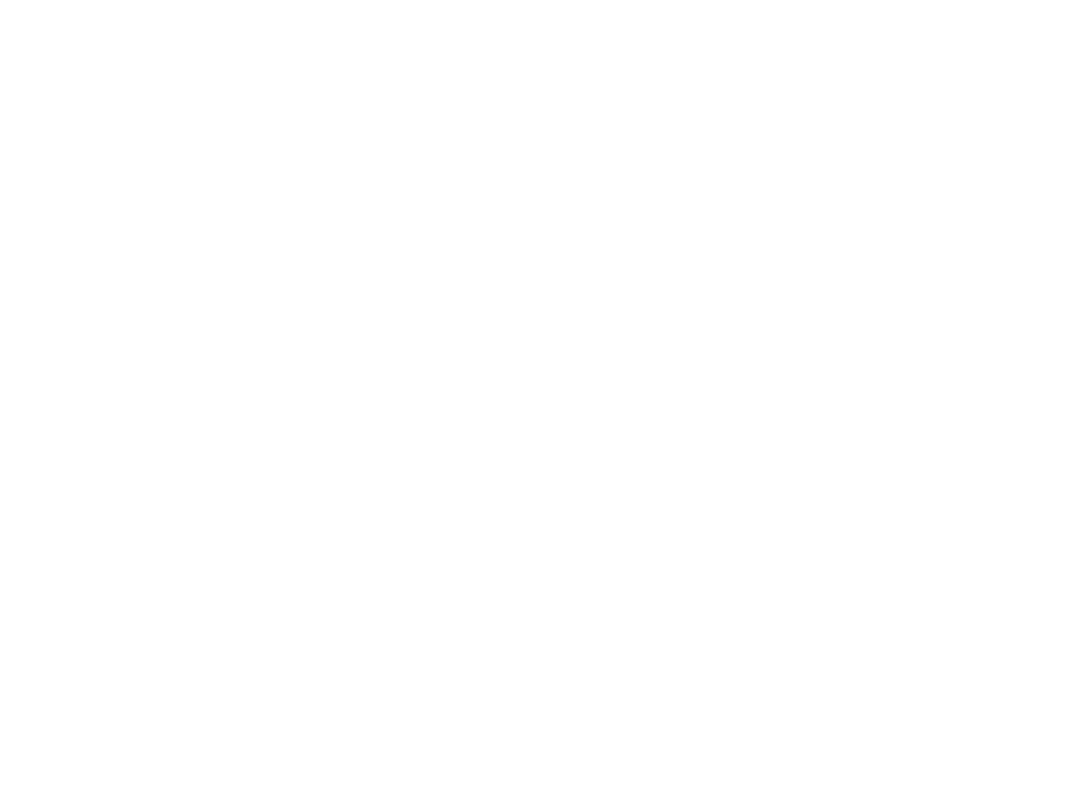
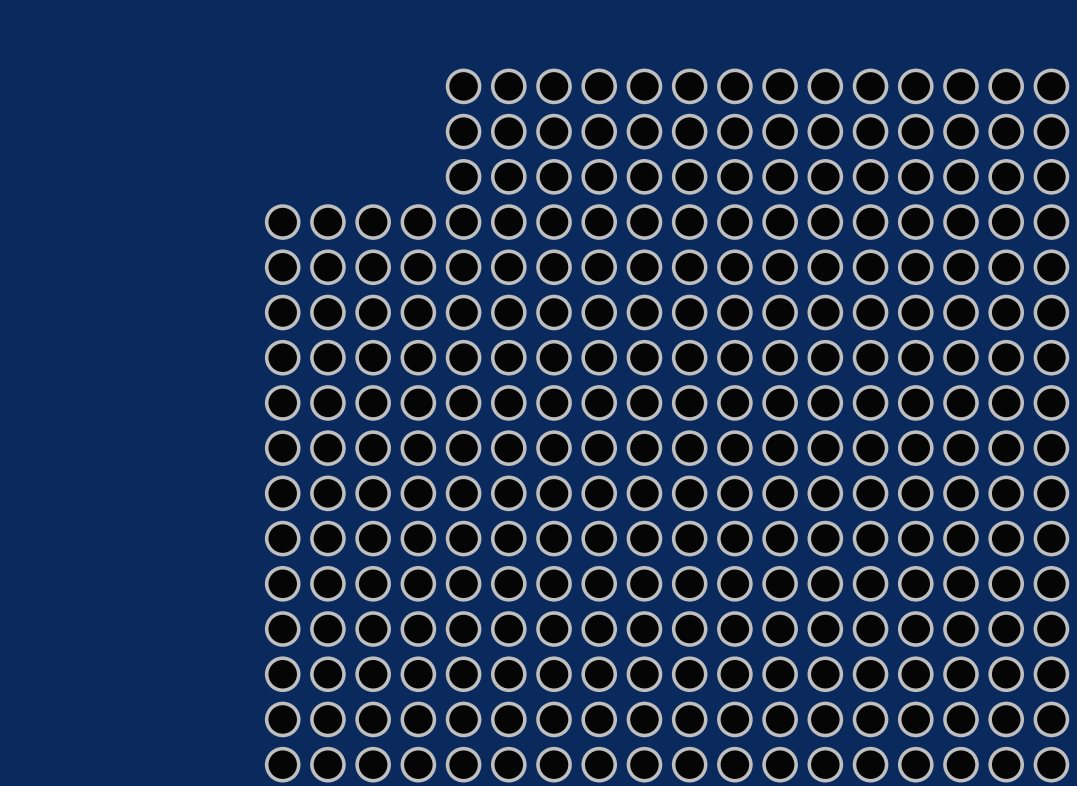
via: none -> (463, 86)
via: none -> (508, 86)
via: none -> (554, 86)
via: none -> (599, 86)
via: none -> (644, 86)
via: none -> (689, 86)
via: none -> (734, 86)
via: none -> (780, 86)
via: none -> (825, 86)
via: none -> (870, 86)
via: none -> (915, 86)
via: none -> (960, 86)
via: none -> (1006, 86)
via: none -> (1051, 86)
via: none -> (463, 131)
via: none -> (508, 131)
via: none -> (554, 131)
via: none -> (599, 131)
via: none -> (644, 131)
via: none -> (689, 131)
via: none -> (734, 131)
via: none -> (780, 131)
via: none -> (825, 131)
via: none -> (870, 131)
via: none -> (915, 131)
via: none -> (960, 131)
via: none -> (1006, 131)
via: none -> (1051, 131)
via: none -> (463, 176)
via: none -> (508, 176)
via: none -> (554, 176)
via: none -> (599, 176)
via: none -> (644, 176)
via: none -> (689, 176)
via: none -> (734, 176)
via: none -> (780, 176)
via: none -> (825, 176)
via: none -> (870, 176)
via: none -> (915, 176)
via: none -> (960, 176)
via: none -> (1006, 176)
via: none -> (1051, 176)
via: none -> (282, 222)
via: none -> (327, 222)
via: none -> (373, 222)
via: none -> (418, 222)
via: none -> (463, 222)
via: none -> (508, 222)
via: none -> (554, 222)
via: none -> (599, 222)
via: none -> (644, 222)
via: none -> (689, 222)
via: none -> (734, 222)
via: none -> (780, 222)
via: none -> (825, 222)
via: none -> (870, 222)
via: none -> (915, 222)
via: none -> (960, 222)
via: none -> (1006, 222)
via: none -> (1051, 222)
via: none -> (282, 267)
via: none -> (327, 267)
via: none -> (373, 267)
via: none -> (418, 267)
via: none -> (463, 267)
via: none -> (508, 267)
via: none -> (554, 267)
via: none -> (599, 267)
via: none -> (644, 267)
via: none -> (689, 267)
via: none -> (734, 267)
via: none -> (780, 267)
via: none -> (825, 267)
via: none -> (870, 267)
via: none -> (915, 267)
via: none -> (960, 267)
via: none -> (1006, 267)
via: none -> (1051, 267)
via: none -> (282, 312)
via: none -> (327, 312)
via: none -> (373, 312)
via: none -> (418, 312)
via: none -> (463, 312)
via: none -> (508, 312)
via: none -> (554, 312)
via: none -> (599, 312)
via: none -> (644, 312)
via: none -> (689, 312)
via: none -> (734, 312)
via: none -> (780, 312)
via: none -> (825, 312)
via: none -> (870, 312)
via: none -> (915, 312)
via: none -> (960, 312)
via: none -> (1006, 312)
via: none -> (1051, 312)
via: none -> (282, 357)
via: none -> (327, 357)
via: none -> (373, 357)
via: none -> (418, 357)
via: none -> (463, 357)
via: none -> (508, 357)
via: none -> (554, 357)
via: none -> (599, 357)
via: none -> (644, 357)
via: none -> (689, 357)
via: none -> (734, 357)
via: none -> (780, 357)
via: none -> (825, 357)
via: none -> (870, 357)
via: none -> (915, 357)
via: none -> (960, 357)
via: none -> (1006, 357)
via: none -> (1051, 357)
via: none -> (282, 402)
via: none -> (327, 402)
via: none -> (373, 402)
via: none -> (418, 402)
via: none -> (463, 402)
via: none -> (508, 402)
via: none -> (554, 402)
via: none -> (599, 402)
via: none -> (644, 402)
via: none -> (689, 402)
via: none -> (734, 402)
via: none -> (780, 402)
via: none -> (825, 402)
via: none -> (870, 402)
via: none -> (915, 402)
via: none -> (960, 402)
via: none -> (1006, 402)
via: none -> (1051, 402)
via: none -> (282, 448)
via: none -> (327, 448)
via: none -> (373, 448)
via: none -> (418, 448)
via: none -> (463, 448)
via: none -> (508, 448)
via: none -> (554, 448)
via: none -> (599, 448)
via: none -> (644, 448)
via: none -> (689, 448)
via: none -> (734, 448)
via: none -> (780, 448)
via: none -> (825, 448)
via: none -> (870, 448)
via: none -> (915, 448)
via: none -> (960, 448)
via: none -> (1006, 448)
via: none -> (1051, 448)
via: none -> (282, 493)
via: none -> (327, 493)
via: none -> (373, 493)
via: none -> (418, 493)
via: none -> (463, 493)
via: none -> (508, 493)
via: none -> (554, 493)
via: none -> (599, 493)
via: none -> (644, 493)
via: none -> (689, 493)
via: none -> (734, 493)
via: none -> (780, 493)
via: none -> (825, 493)
via: none -> (870, 493)
via: none -> (915, 493)
via: none -> (960, 493)
via: none -> (1006, 493)
via: none -> (1051, 493)
via: none -> (282, 538)
via: none -> (327, 538)
via: none -> (373, 538)
via: none -> (418, 538)
via: none -> (463, 538)
via: none -> (508, 538)
via: none -> (554, 538)
via: none -> (599, 538)
via: none -> (644, 538)
via: none -> (689, 538)
via: none -> (734, 538)
via: none -> (780, 538)
via: none -> (825, 538)
via: none -> (870, 538)
via: none -> (915, 538)
via: none -> (960, 538)
via: none -> (1006, 538)
via: none -> (1051, 538)
via: none -> (282, 583)
via: none -> (327, 583)
via: none -> (373, 583)
via: none -> (418, 583)
via: none -> (463, 583)
via: none -> (508, 583)
via: none -> (554, 583)
via: none -> (599, 583)
via: none -> (644, 583)
via: none -> (689, 583)
via: none -> (734, 583)
via: none -> (780, 583)
via: none -> (825, 583)
via: none -> (870, 583)
via: none -> (915, 583)
via: none -> (960, 583)
via: none -> (1006, 583)
via: none -> (1051, 583)
via: none -> (282, 629)
via: none -> (327, 629)
via: none -> (373, 629)
via: none -> (418, 629)
via: none -> (463, 629)
via: none -> (508, 629)
via: none -> (554, 629)
via: none -> (599, 629)
via: none -> (644, 629)
via: none -> (689, 629)
via: none -> (734, 629)
via: none -> (780, 629)
via: none -> (825, 629)
via: none -> (870, 629)
via: none -> (915, 629)
via: none -> (960, 629)
via: none -> (1006, 629)
via: none -> (1051, 629)
via: none -> (282, 674)
via: none -> (327, 674)
via: none -> (373, 674)
via: none -> (418, 674)
via: none -> (463, 674)
via: none -> (508, 674)
via: none -> (554, 674)
via: none -> (599, 674)
via: none -> (644, 674)
via: none -> (689, 674)
via: none -> (734, 674)
via: none -> (780, 674)
via: none -> (825, 674)
via: none -> (870, 674)
via: none -> (915, 674)
via: none -> (960, 674)
via: none -> (1006, 674)
via: none -> (1051, 674)
via: none -> (282, 719)
via: none -> (327, 719)
via: none -> (373, 719)
via: none -> (418, 719)
via: none -> (463, 719)
via: none -> (508, 719)
via: none -> (554, 719)
via: none -> (599, 719)
via: none -> (644, 719)
via: none -> (689, 719)
via: none -> (734, 719)
via: none -> (780, 719)
via: none -> (825, 719)
via: none -> (870, 719)
via: none -> (915, 719)
via: none -> (960, 719)
via: none -> (1006, 719)
via: none -> (1051, 719)
via: none -> (282, 764)
via: none -> (327, 764)
via: none -> (373, 764)
via: none -> (418, 764)
via: none -> (463, 764)
via: none -> (508, 764)
via: none -> (554, 764)
via: none -> (599, 764)
via: none -> (644, 764)
via: none -> (689, 764)
via: none -> (734, 764)
via: none -> (780, 764)
via: none -> (825, 764)
via: none -> (870, 764)
via: none -> (915, 764)
via: none -> (960, 764)
via: none -> (1006, 764)
via: none -> (1051, 764)

